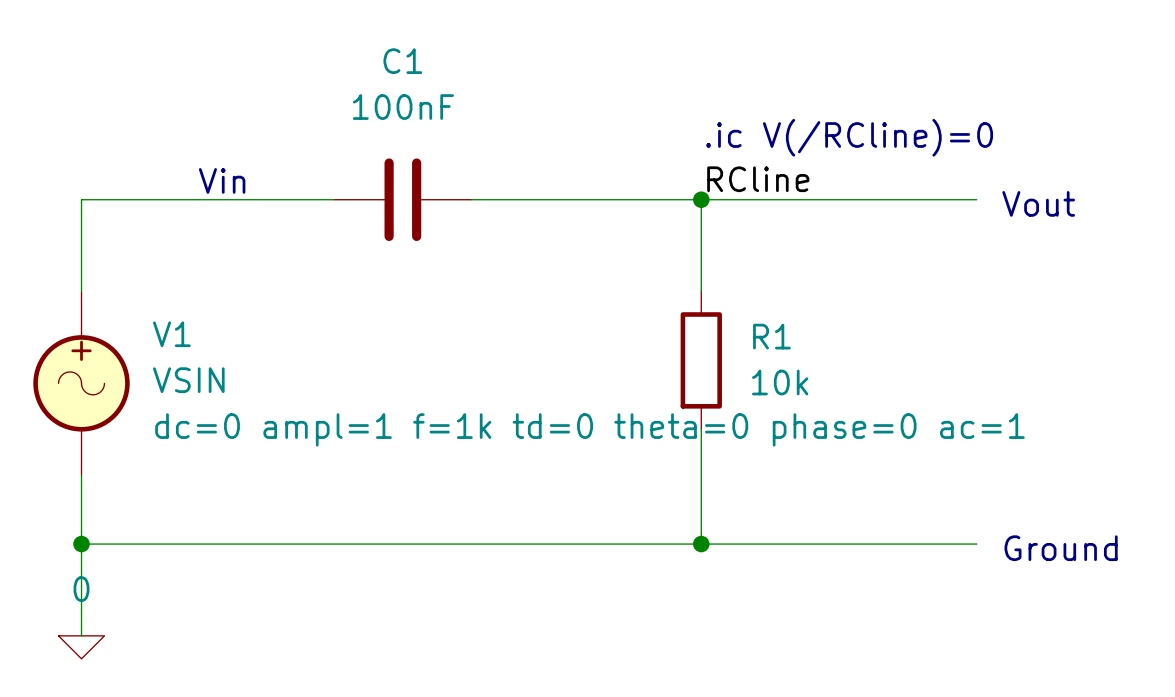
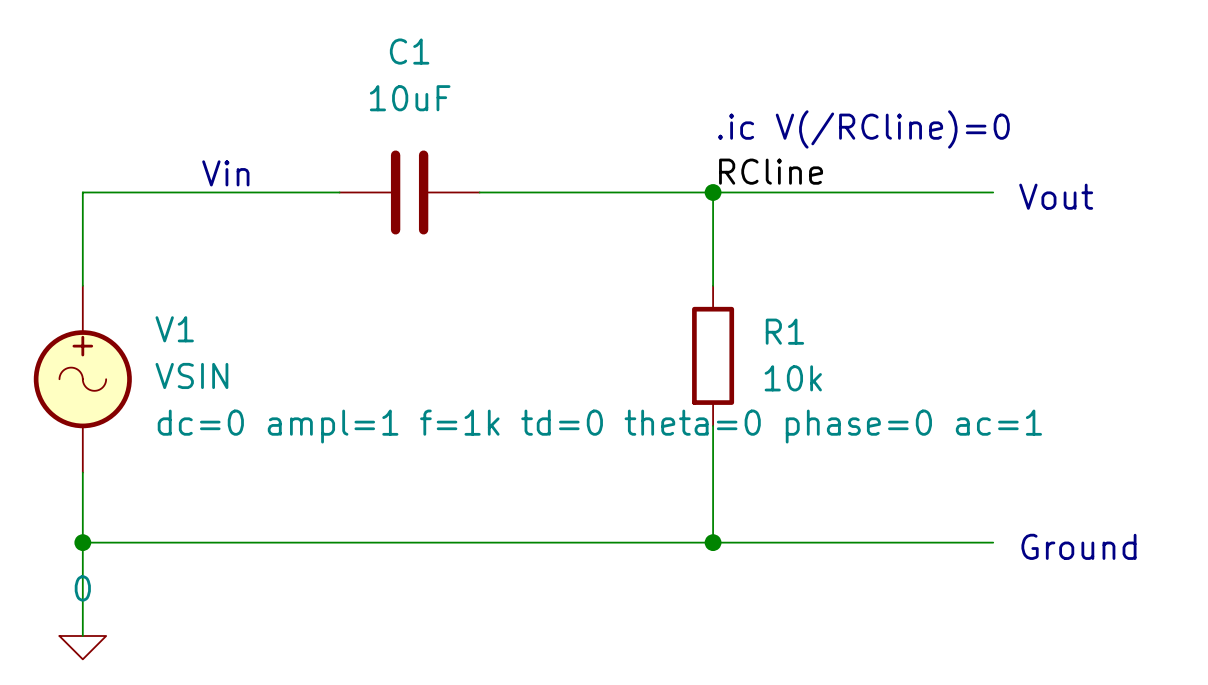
C1 value: 100nF (403, 107) -> 10uF (410, 98)

